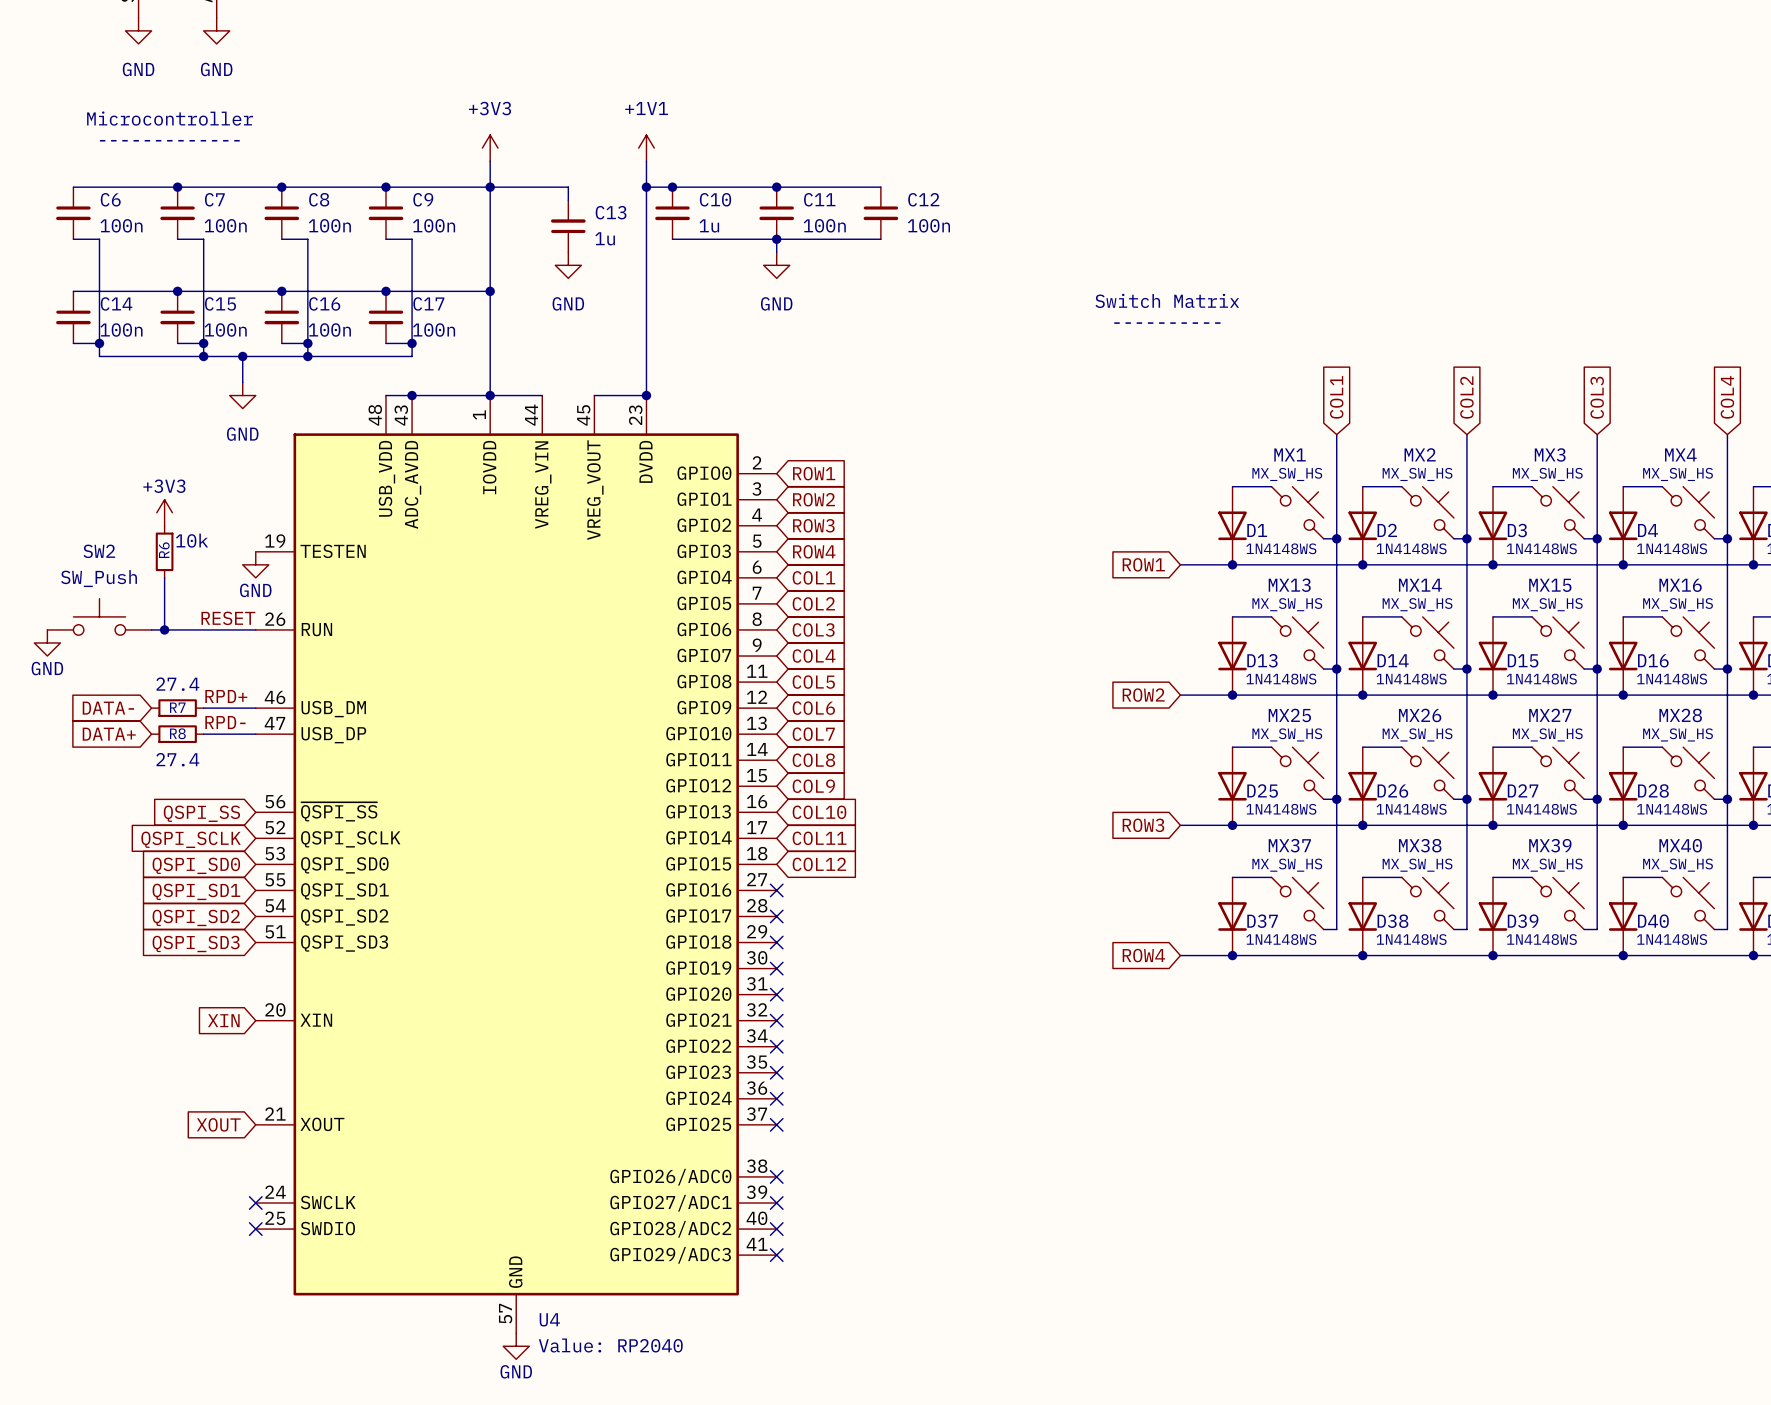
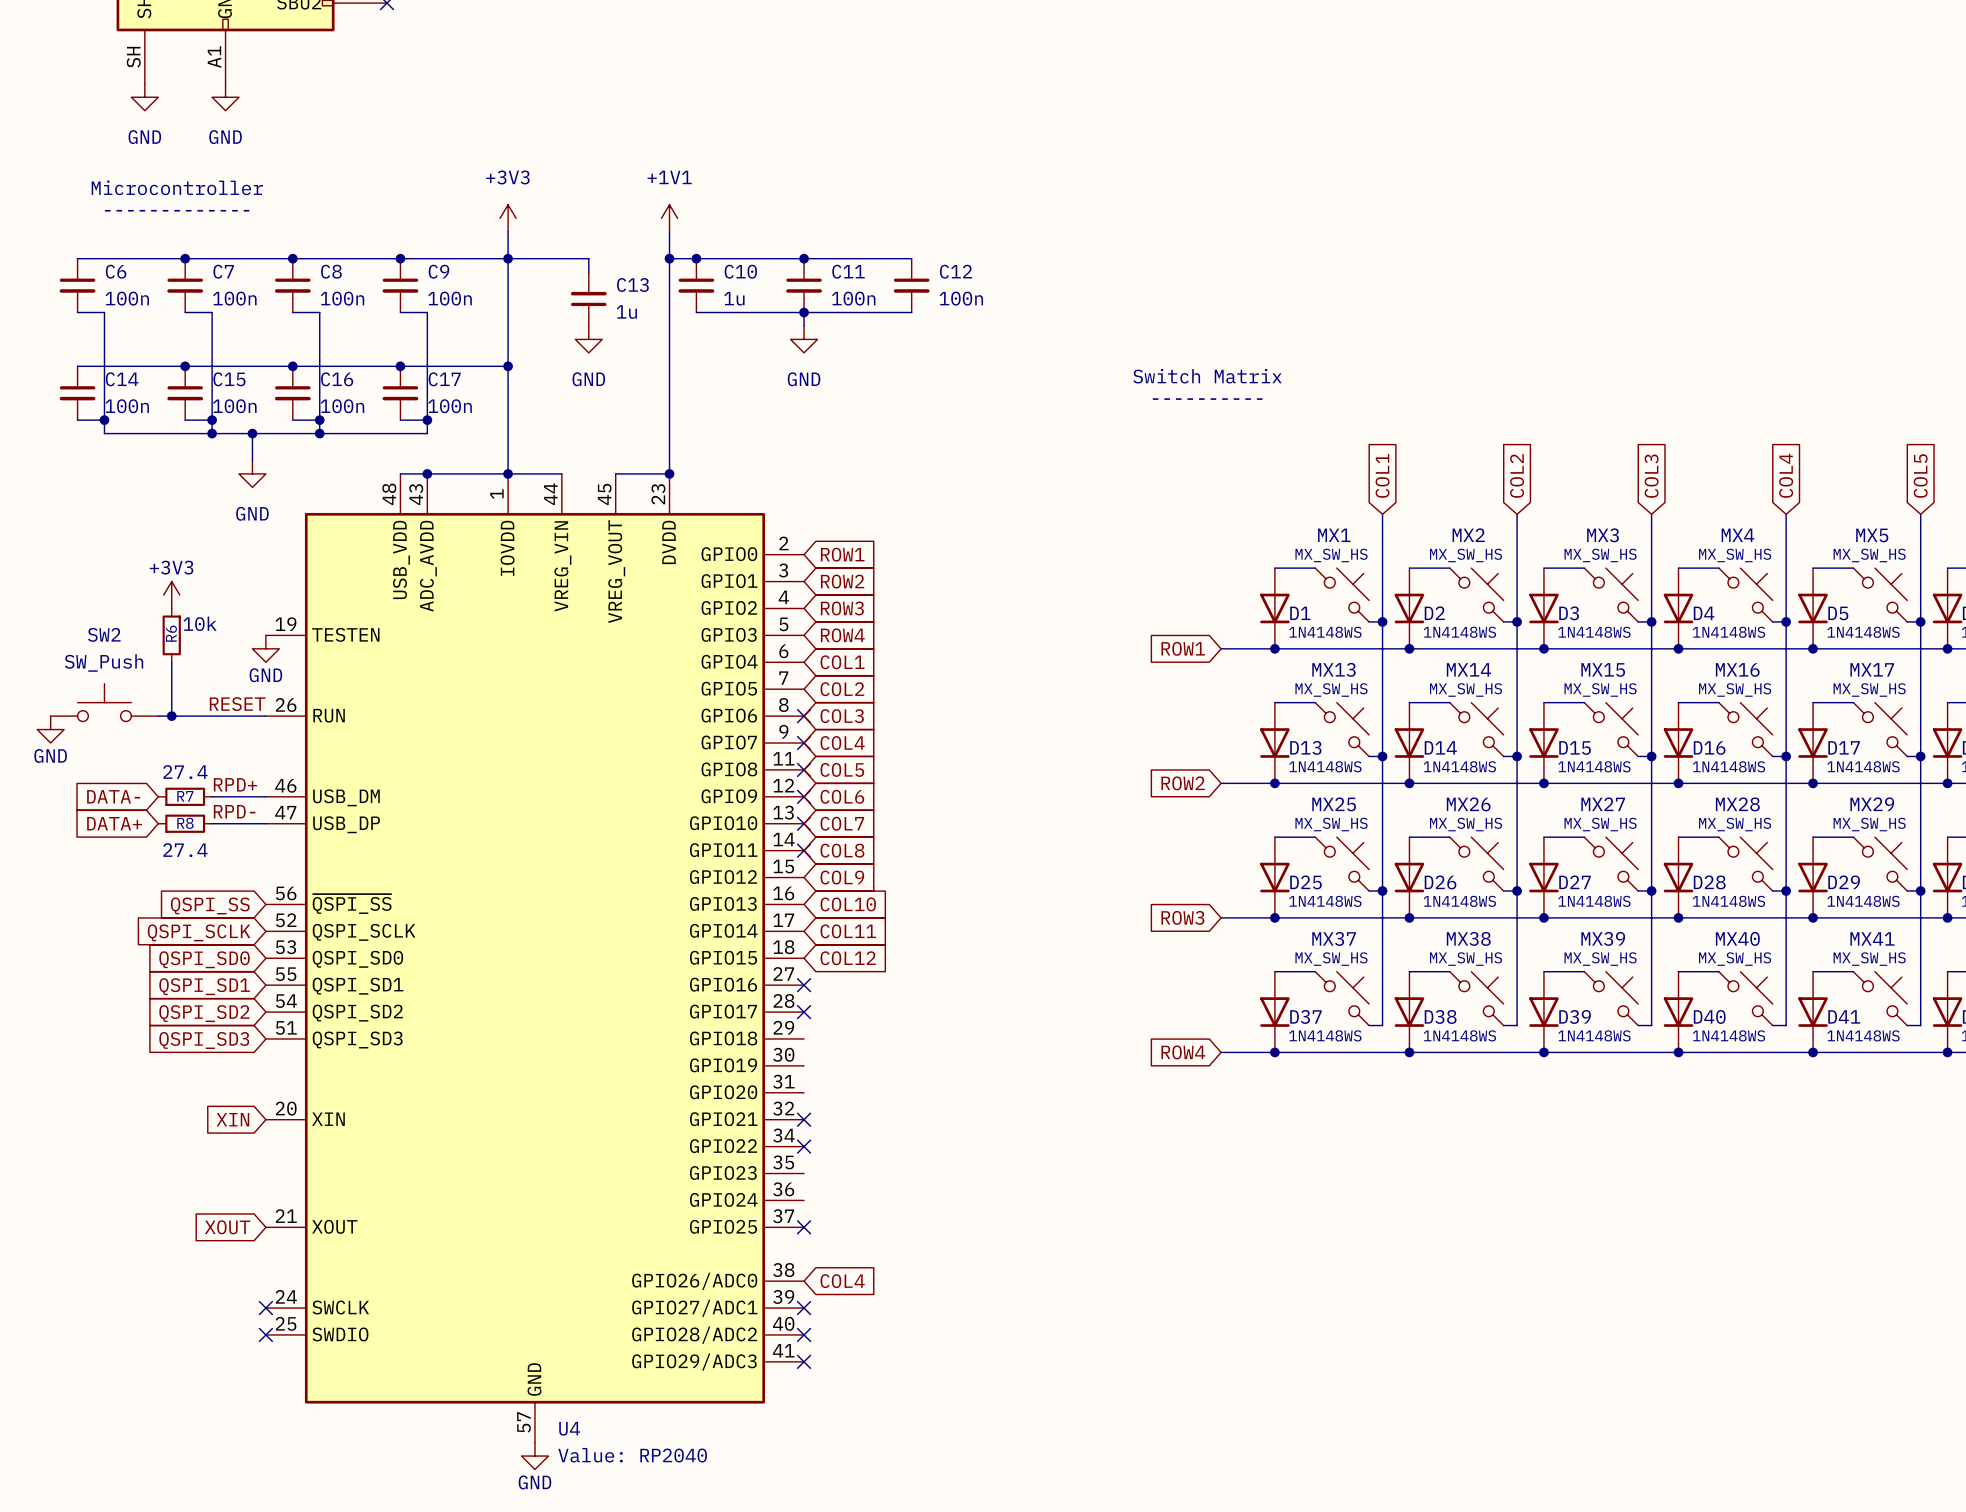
no-connect mark: none -> (804, 716)
no-connect mark: none -> (804, 743)
no-connect mark: none -> (804, 769)
no-connect mark: none -> (804, 796)
no-connect mark: none -> (804, 823)
no-connect mark: none -> (804, 850)
no-connect mark: (776, 942) -> none
no-connect mark: (776, 968) -> none
no-connect mark: (776, 994) -> none
no-connect mark: (776, 1072) -> none
no-connect mark: (776, 1098) -> none
no-connect mark: (776, 1176) -> none
global label: none -> COL4 (842, 1281)

